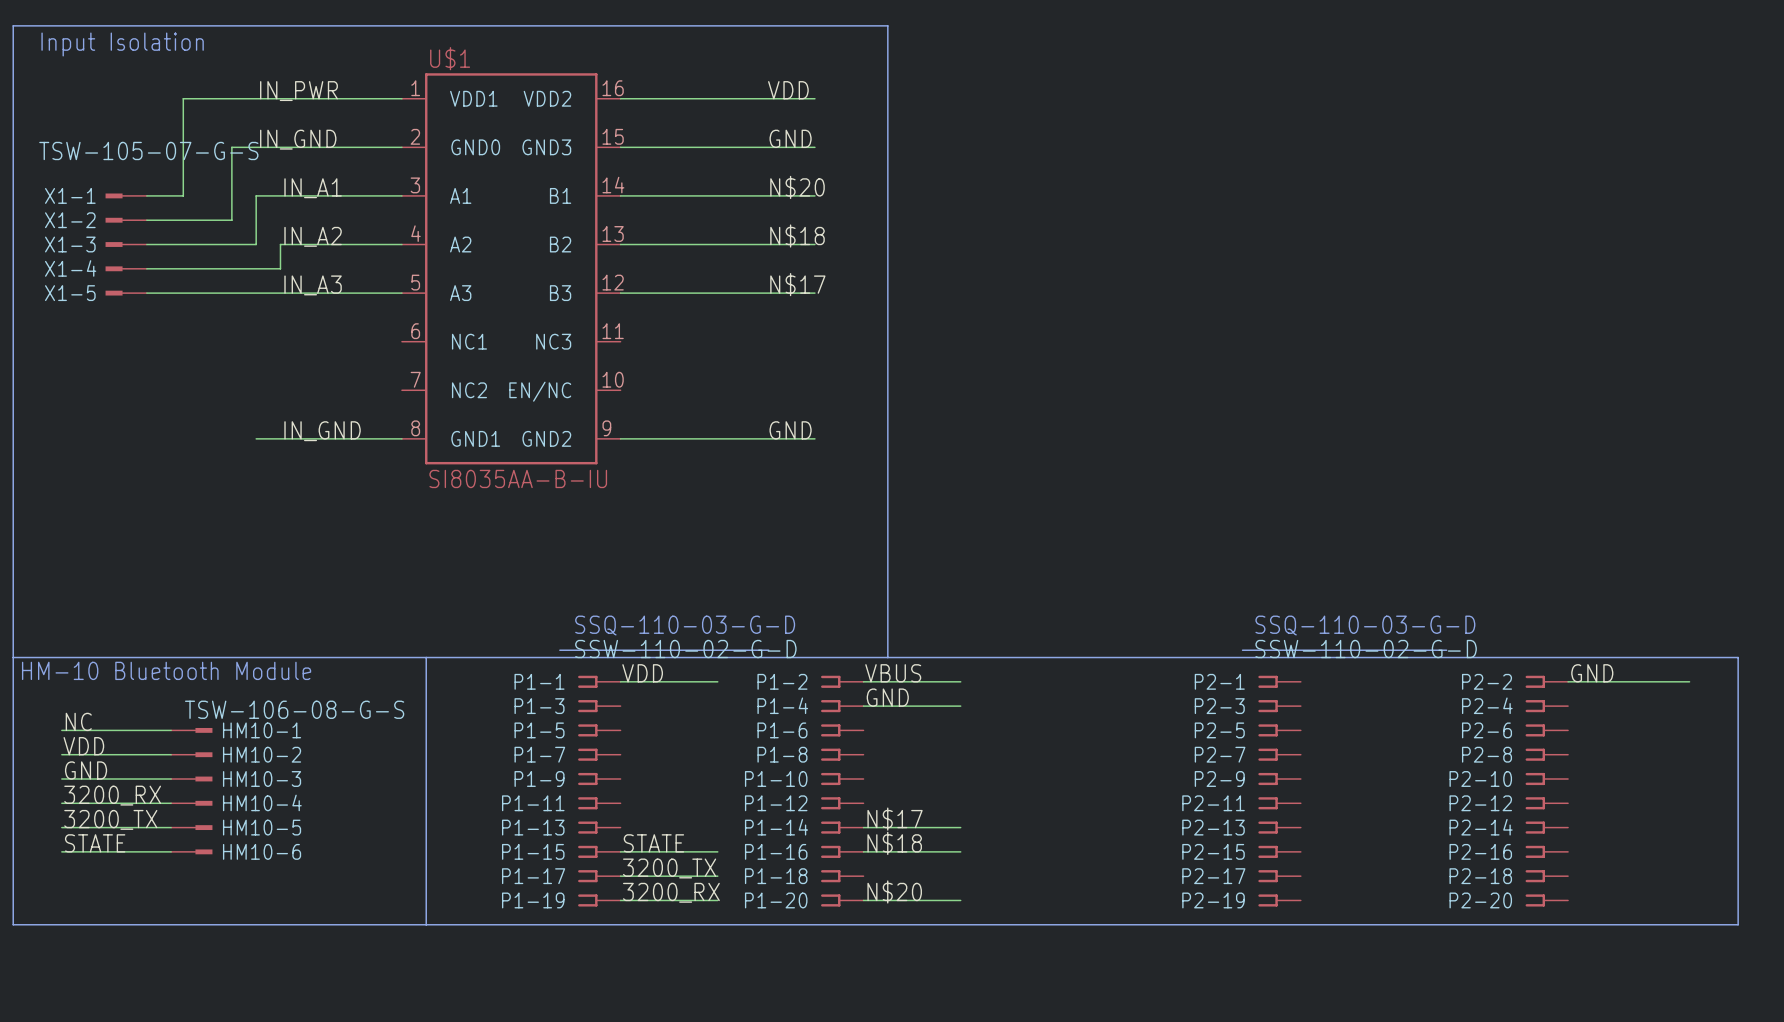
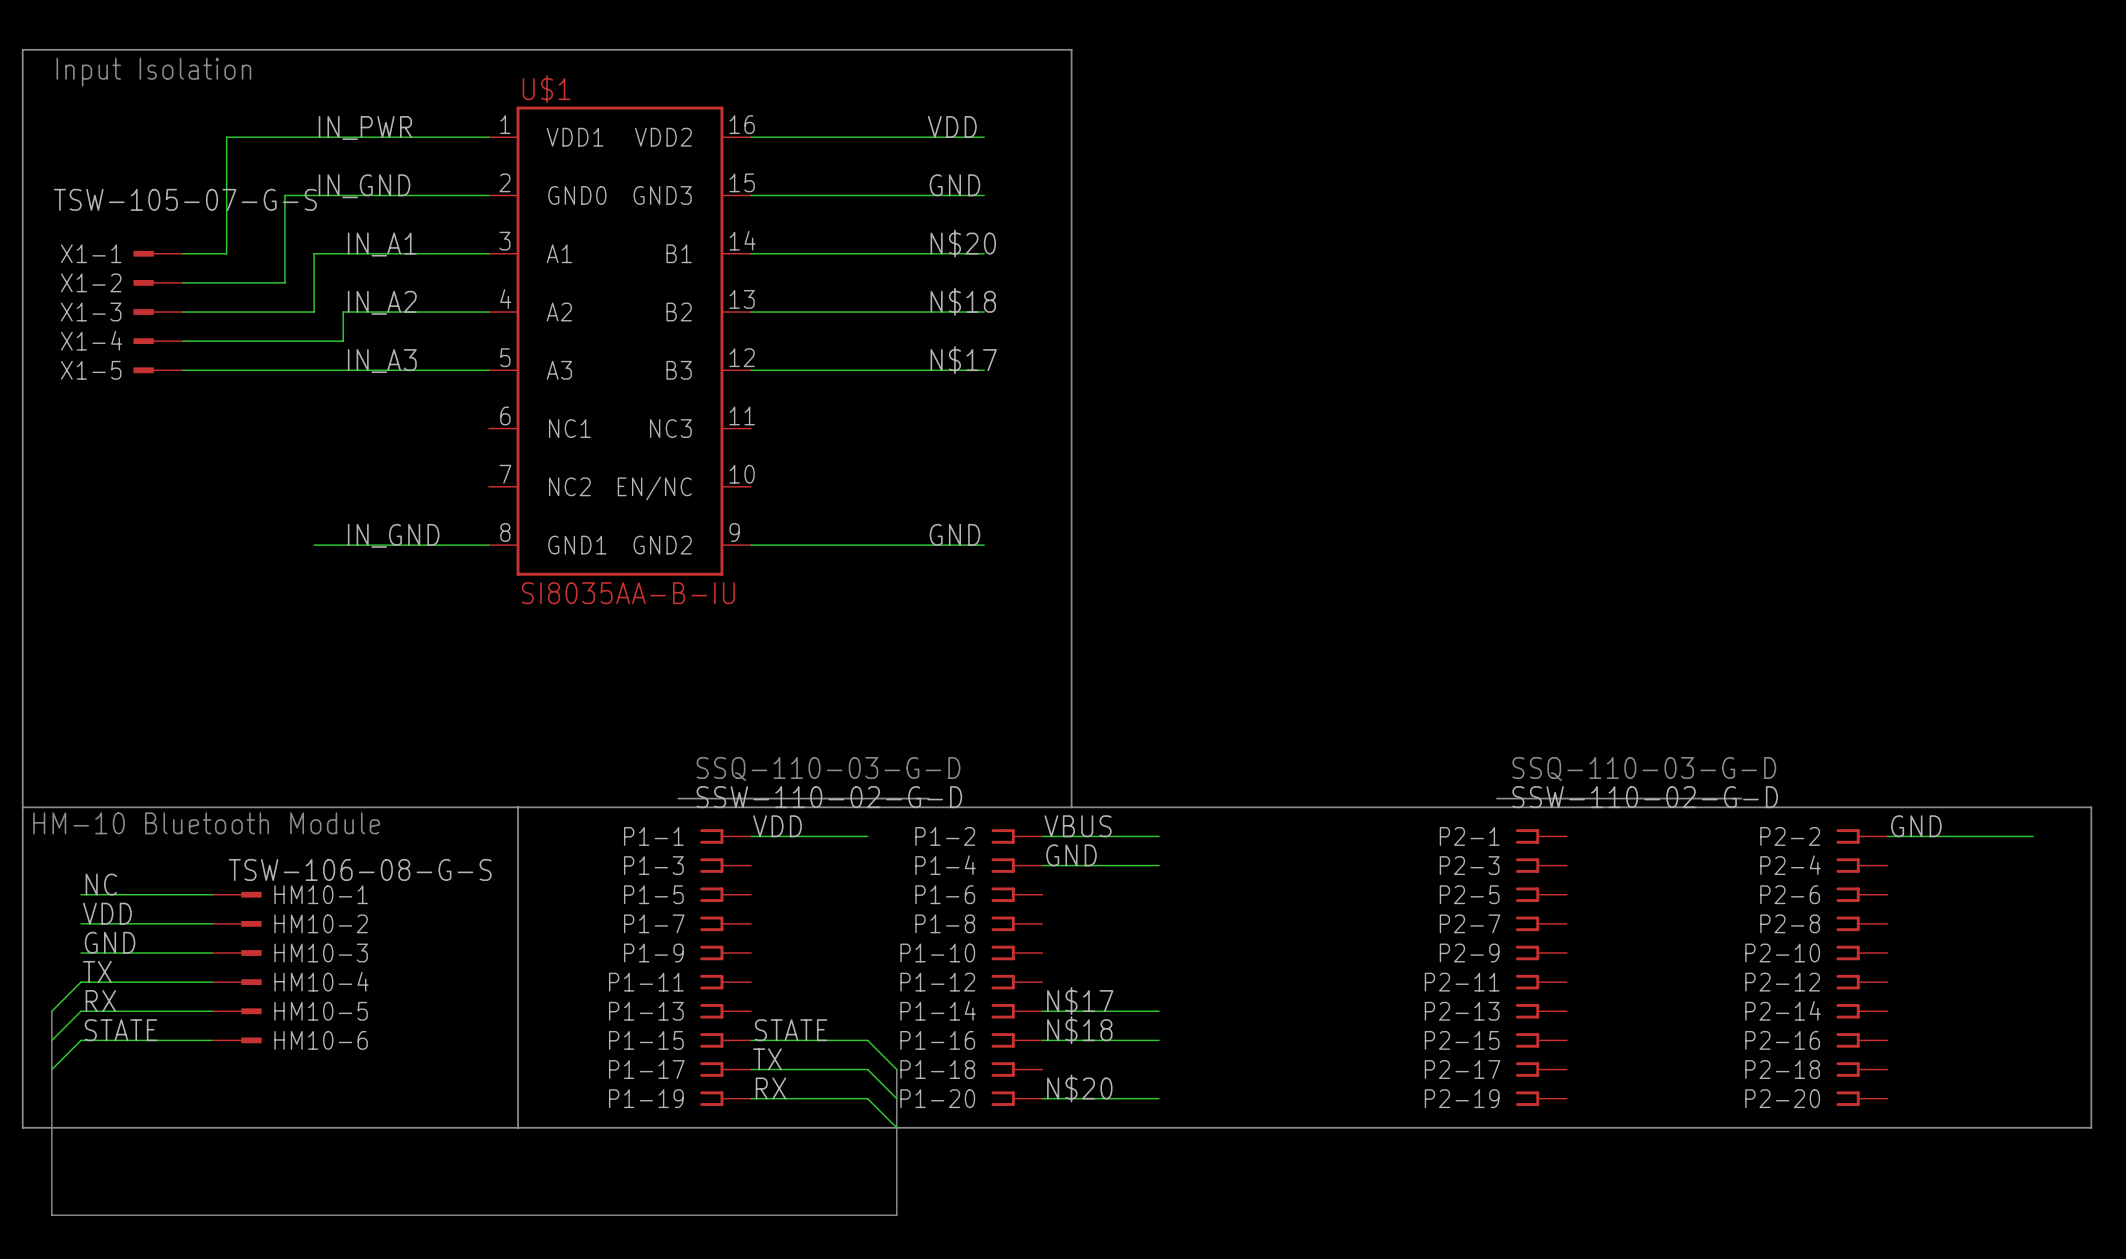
label: 3200_RX (112, 795) -> TX (97, 971)
wire: none -> (80, 982) (51, 1011)
label: 3200_TX (110, 819) -> RX (100, 1001)
bus: none -> (51, 1011) (51, 1215) (896, 1215) (896, 1069)
wire: none -> (80, 1011) (51, 1040)
wire: none -> (80, 1040) (51, 1069)
wire: none -> (867, 1040) (896, 1069)
label: 3200_TX (669, 868) -> TX (767, 1059)
wire: none -> (867, 1069) (896, 1098)
label: 3200_RX (671, 892) -> RX (770, 1088)
wire: none -> (867, 1098) (896, 1127)

